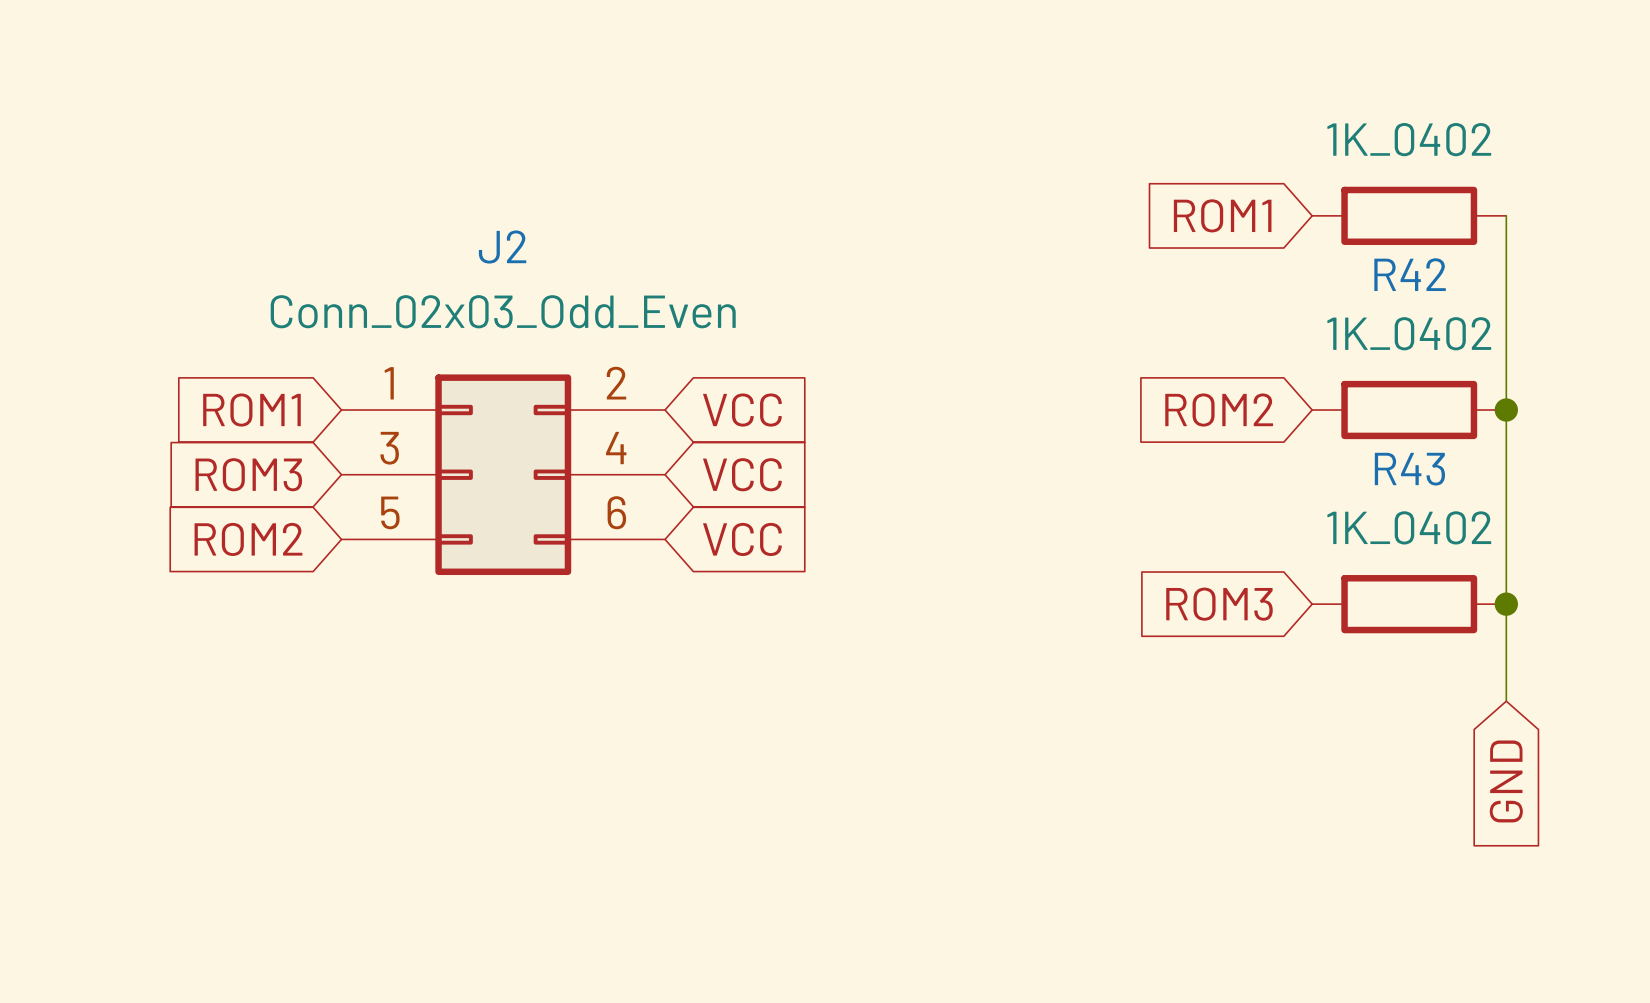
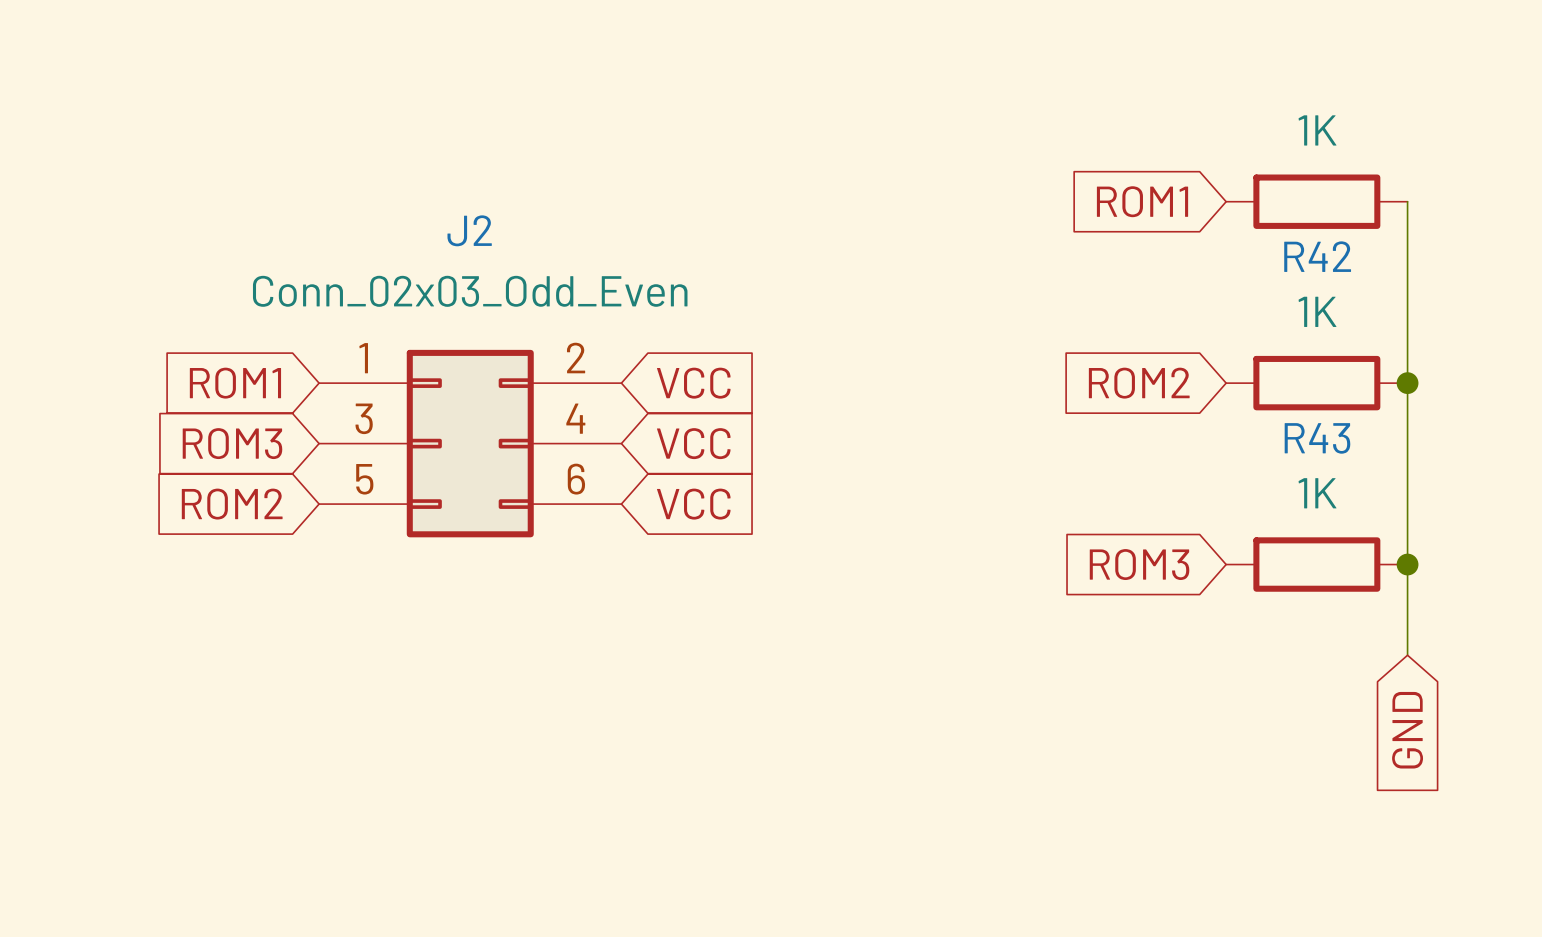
part value: 1K_0402 (1409, 139) -> 1K (1317, 130)
R42 value: 1K_0402 (1409, 333) -> 1K (1317, 311)
R43 value: 1K_0402 (1409, 527) -> 1K (1317, 493)

